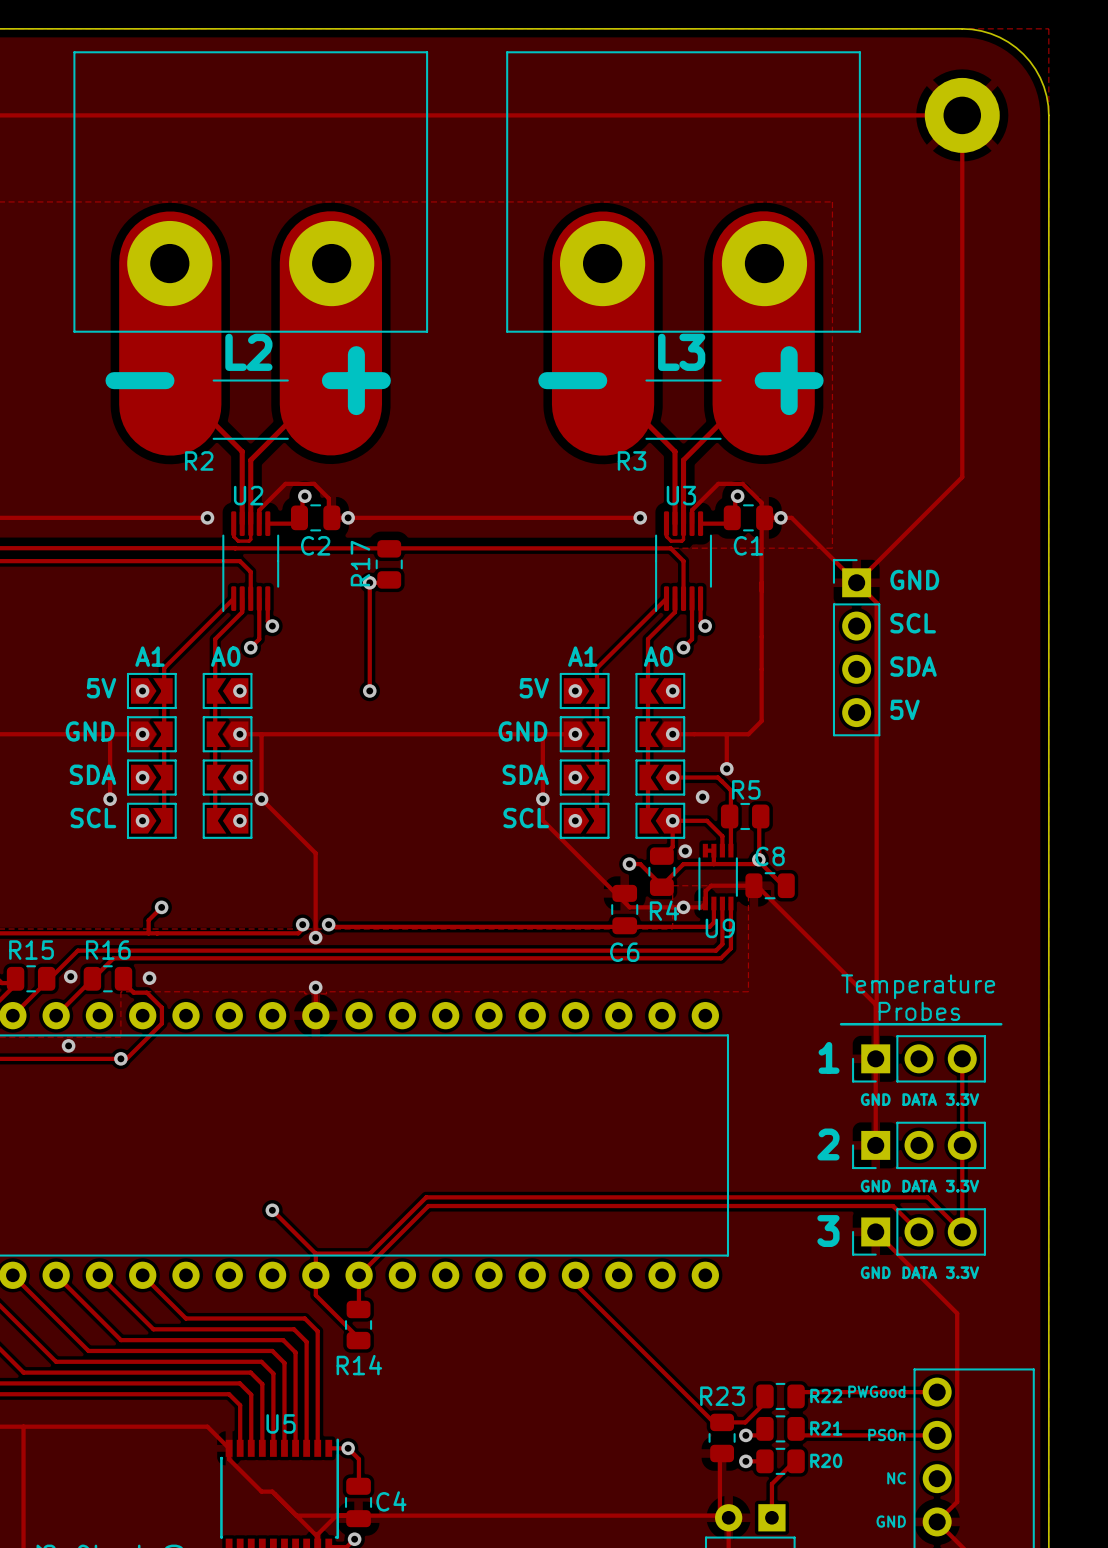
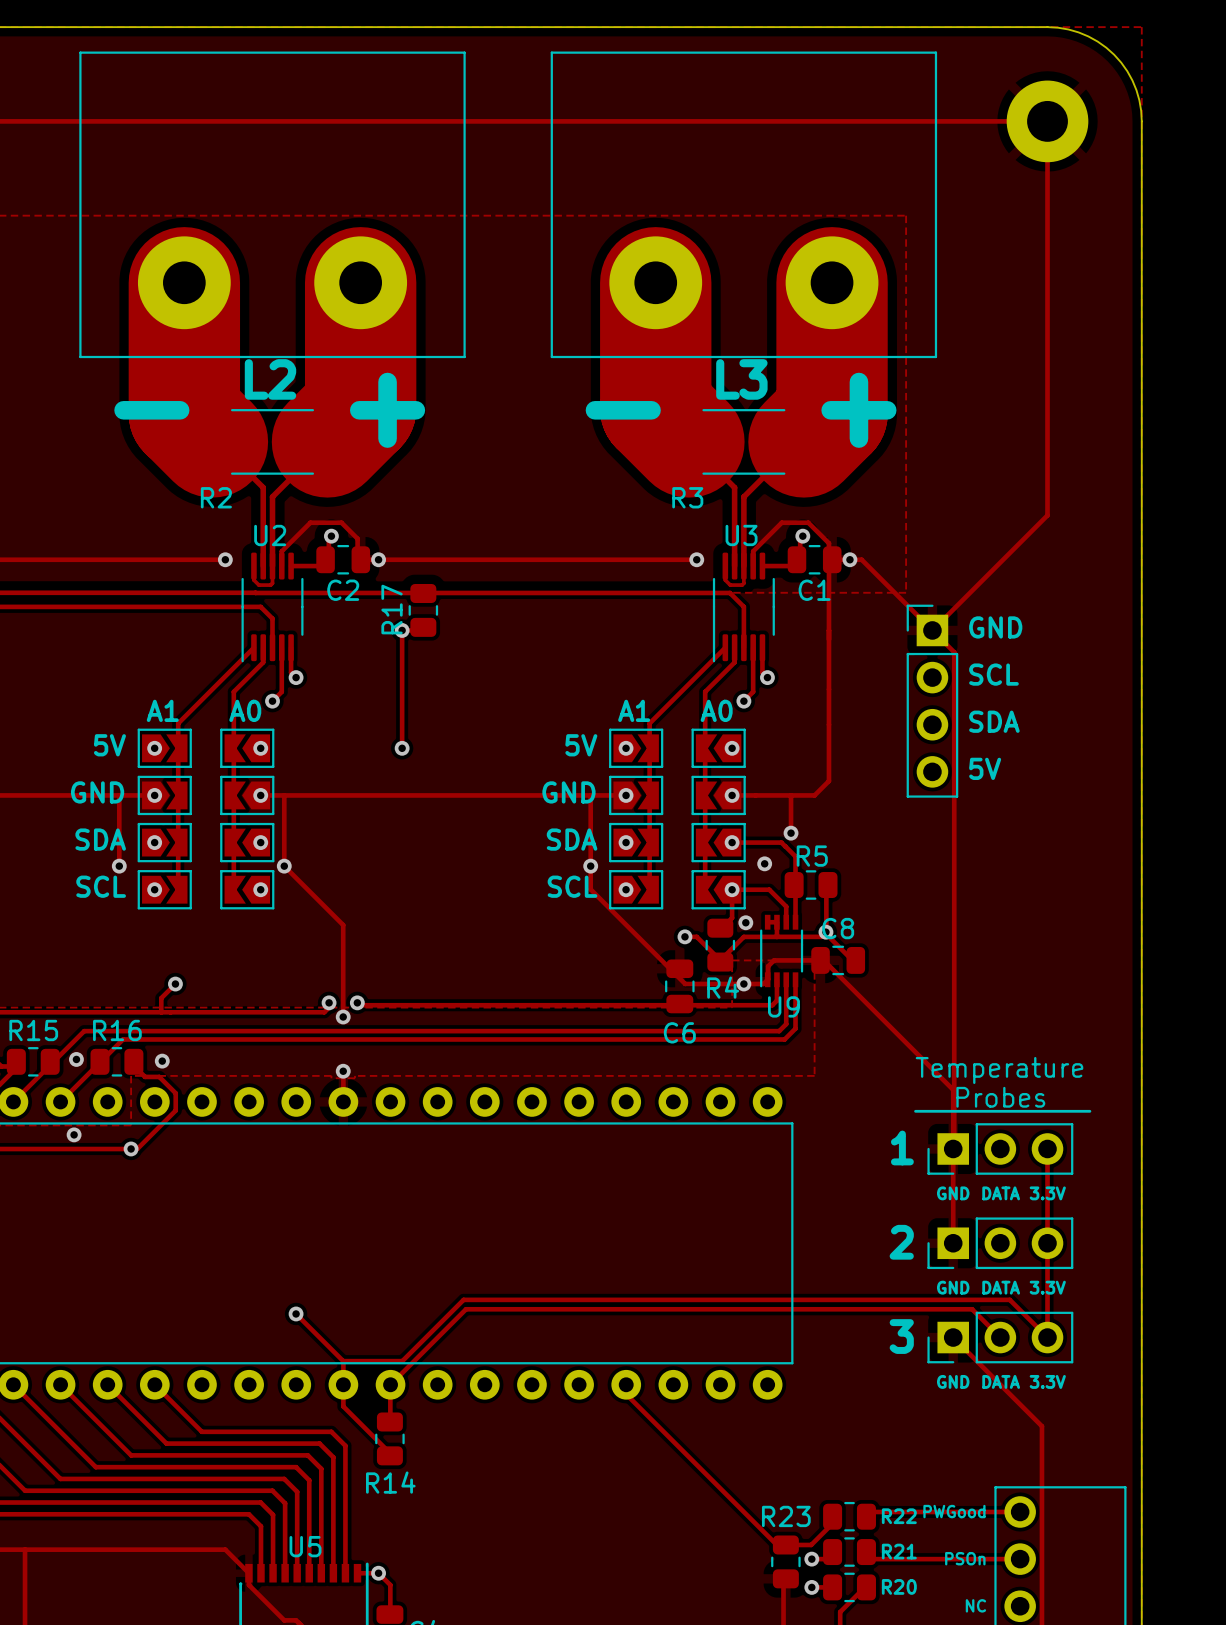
track: (170, 262) (170, 404) -> none
track: (330, 262) (330, 404) -> none
track: (603, 262) (603, 404) -> none
track: (763, 262) (763, 404) -> none
track: none -> (184, 282) (184, 413) (212, 441)
track: none -> (360, 282) (360, 408) (327, 441)
track: none -> (655, 282) (655, 408) (688, 441)
track: none -> (832, 282) (832, 413) (803, 441)

